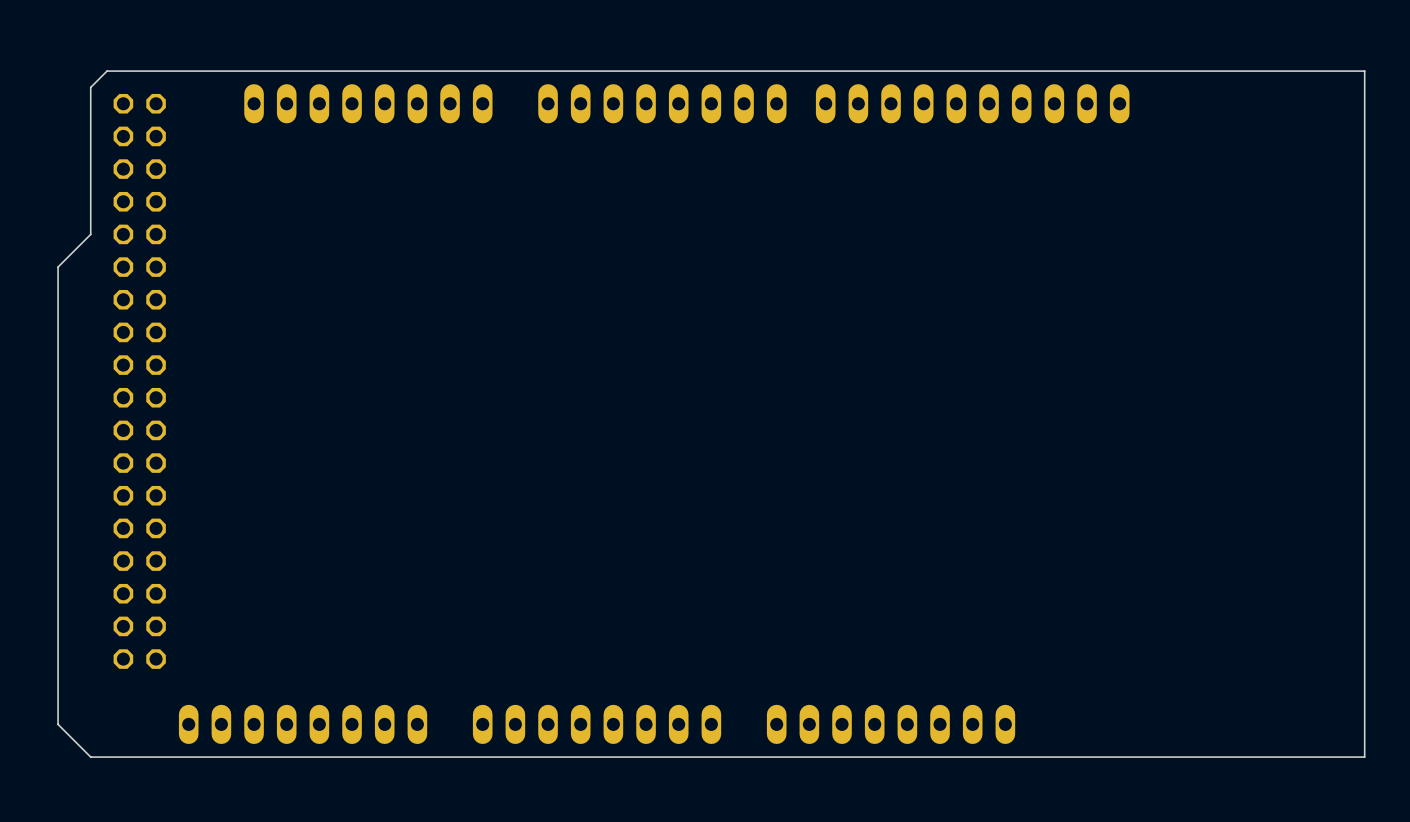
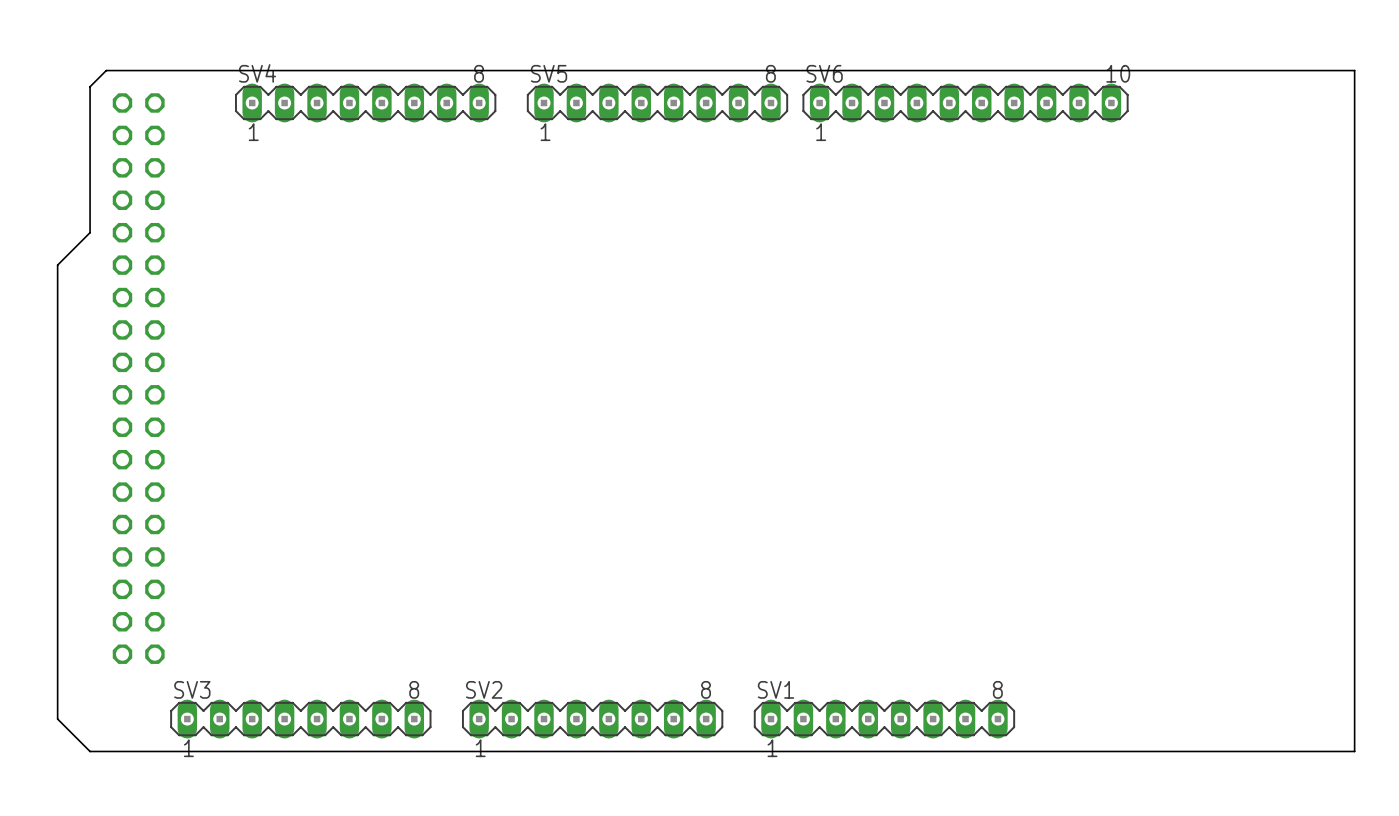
SV4 side: top (368, 103) -> bottom (365, 102)
SV5 side: top (662, 103) -> bottom (657, 102)
SV6 side: top (972, 103) -> bottom (965, 102)
SV3 side: top (303, 724) -> bottom (300, 719)
SV2 side: top (597, 724) -> bottom (592, 719)
SV1 side: top (891, 724) -> bottom (884, 719)

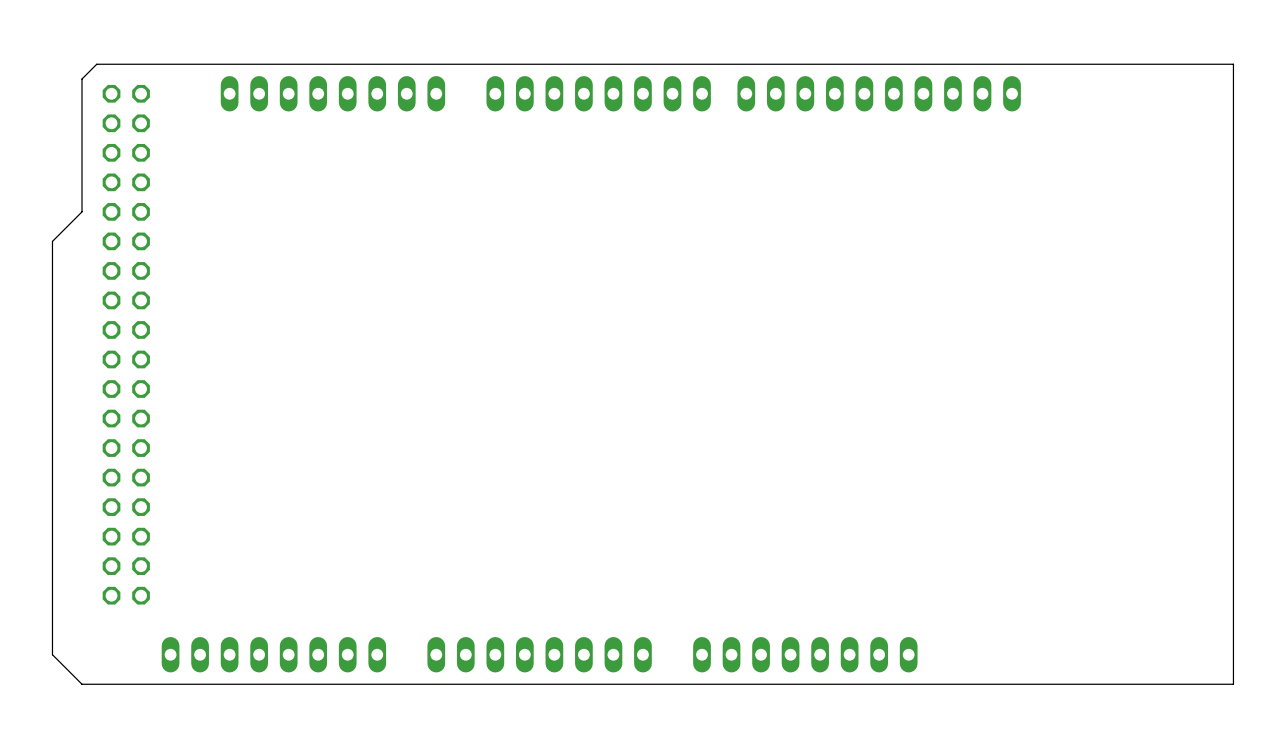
SV4 side: bottom (365, 102) -> top (332, 93)
SV5 side: bottom (657, 102) -> top (598, 93)
SV6 side: bottom (965, 102) -> top (879, 93)
SV3 side: bottom (300, 719) -> top (273, 654)
SV2 side: bottom (592, 719) -> top (539, 654)
SV1 side: bottom (884, 719) -> top (805, 654)

